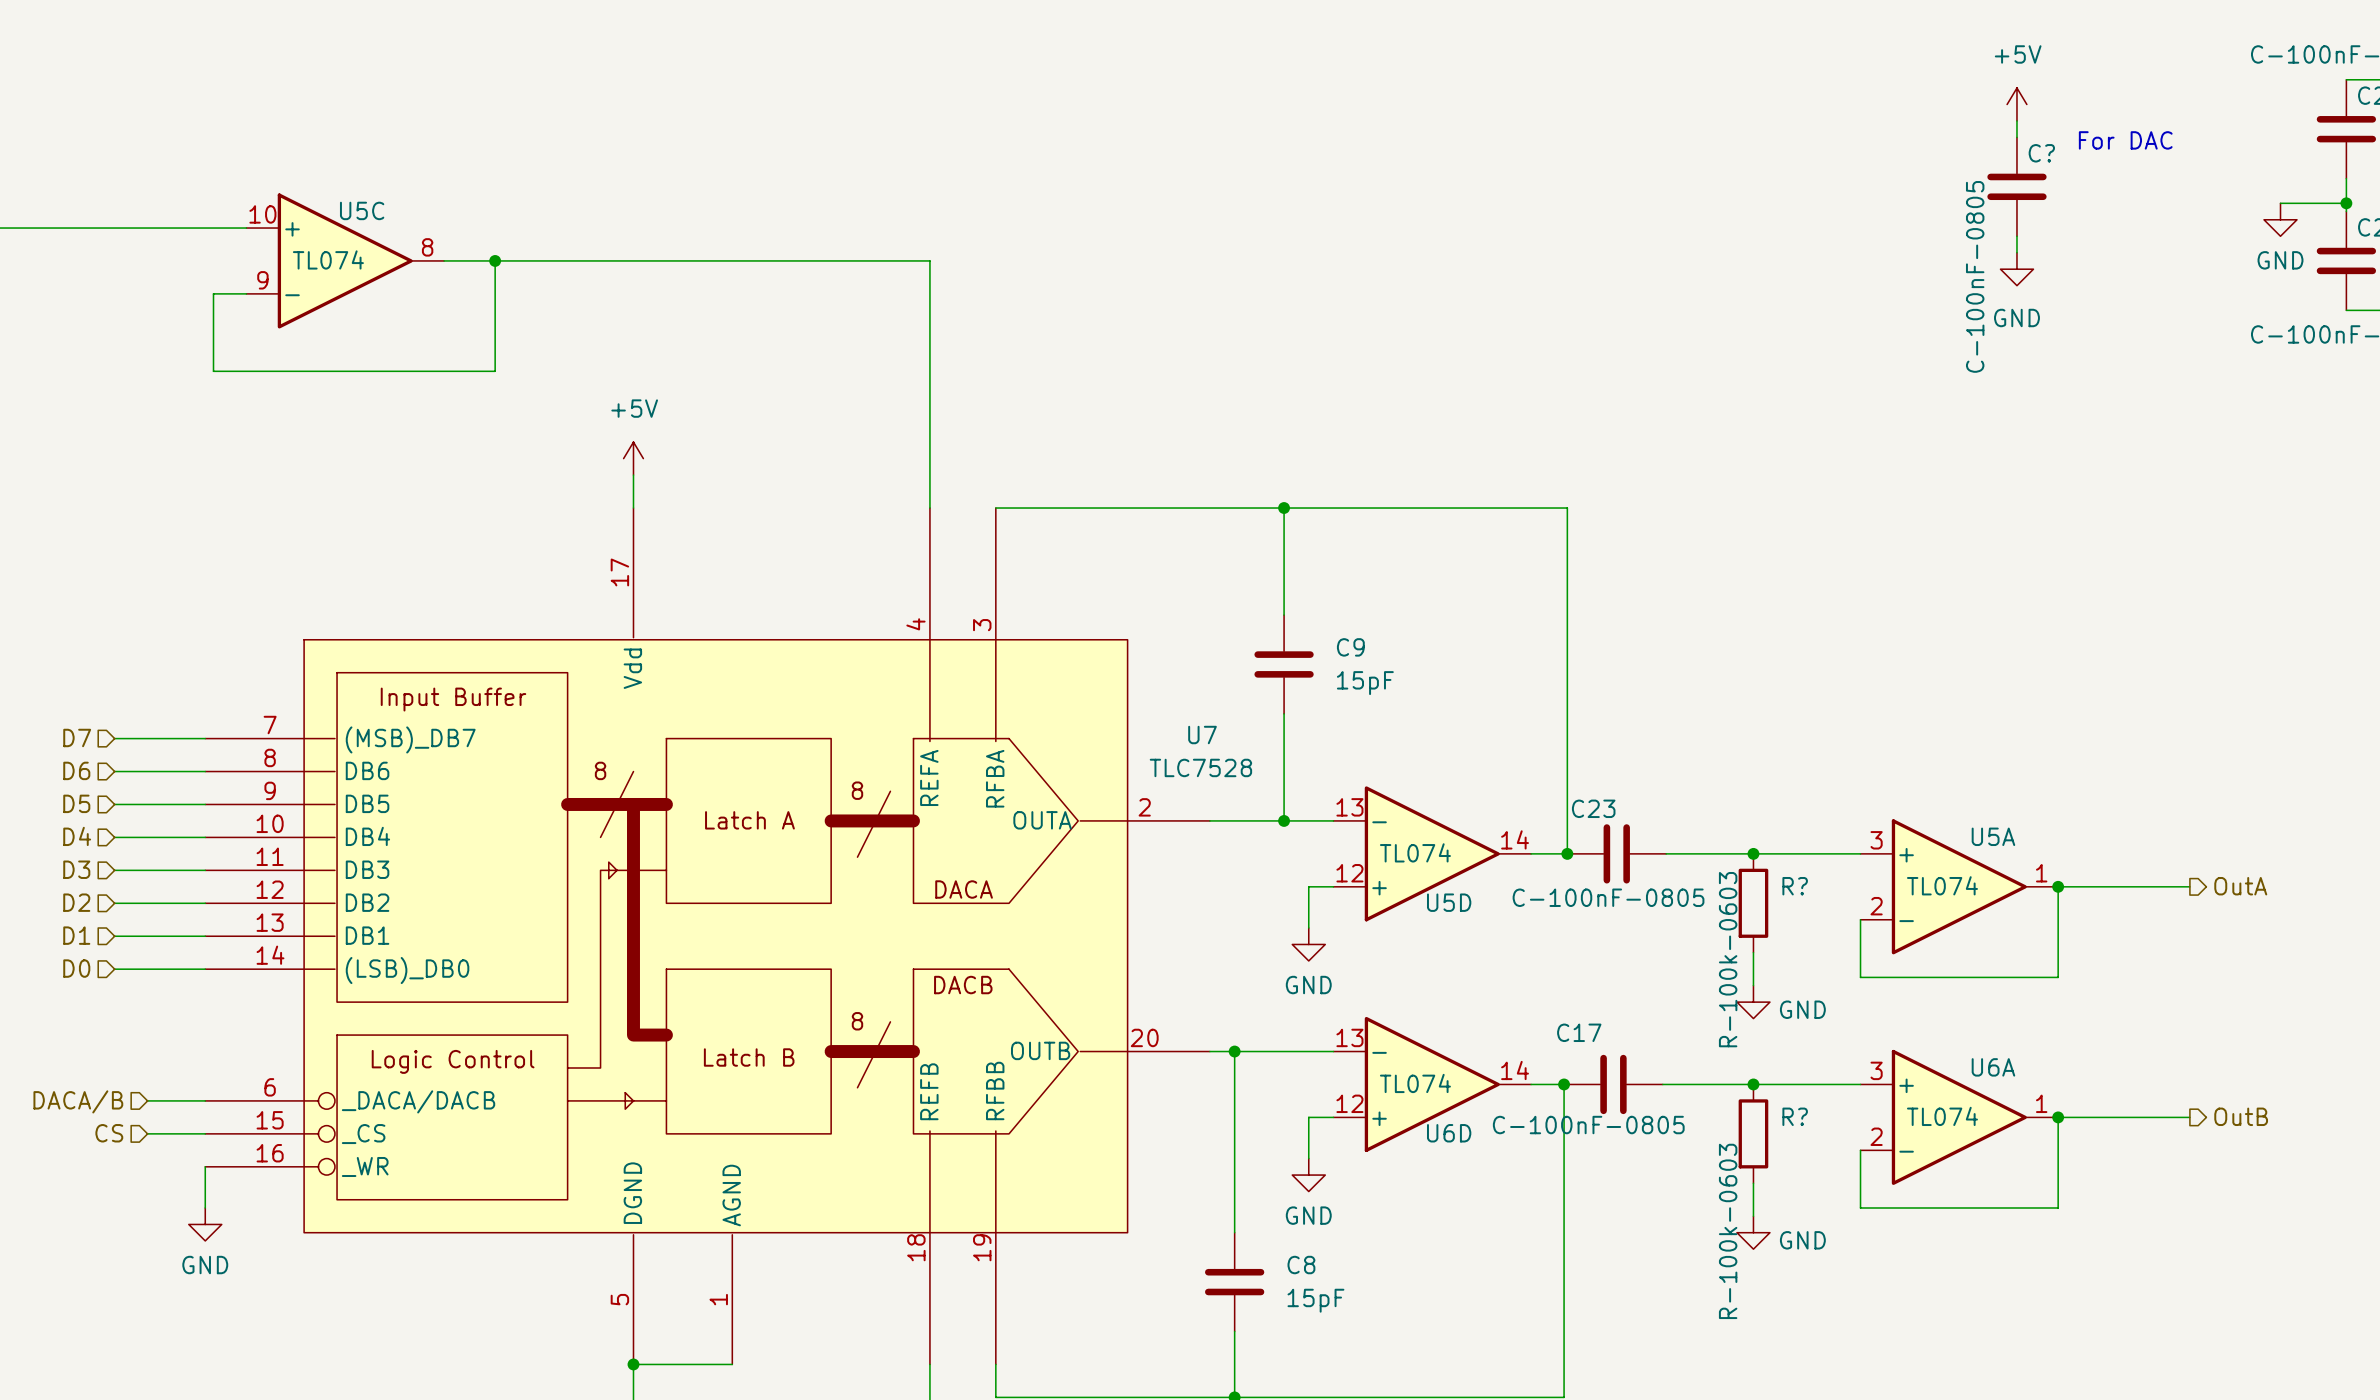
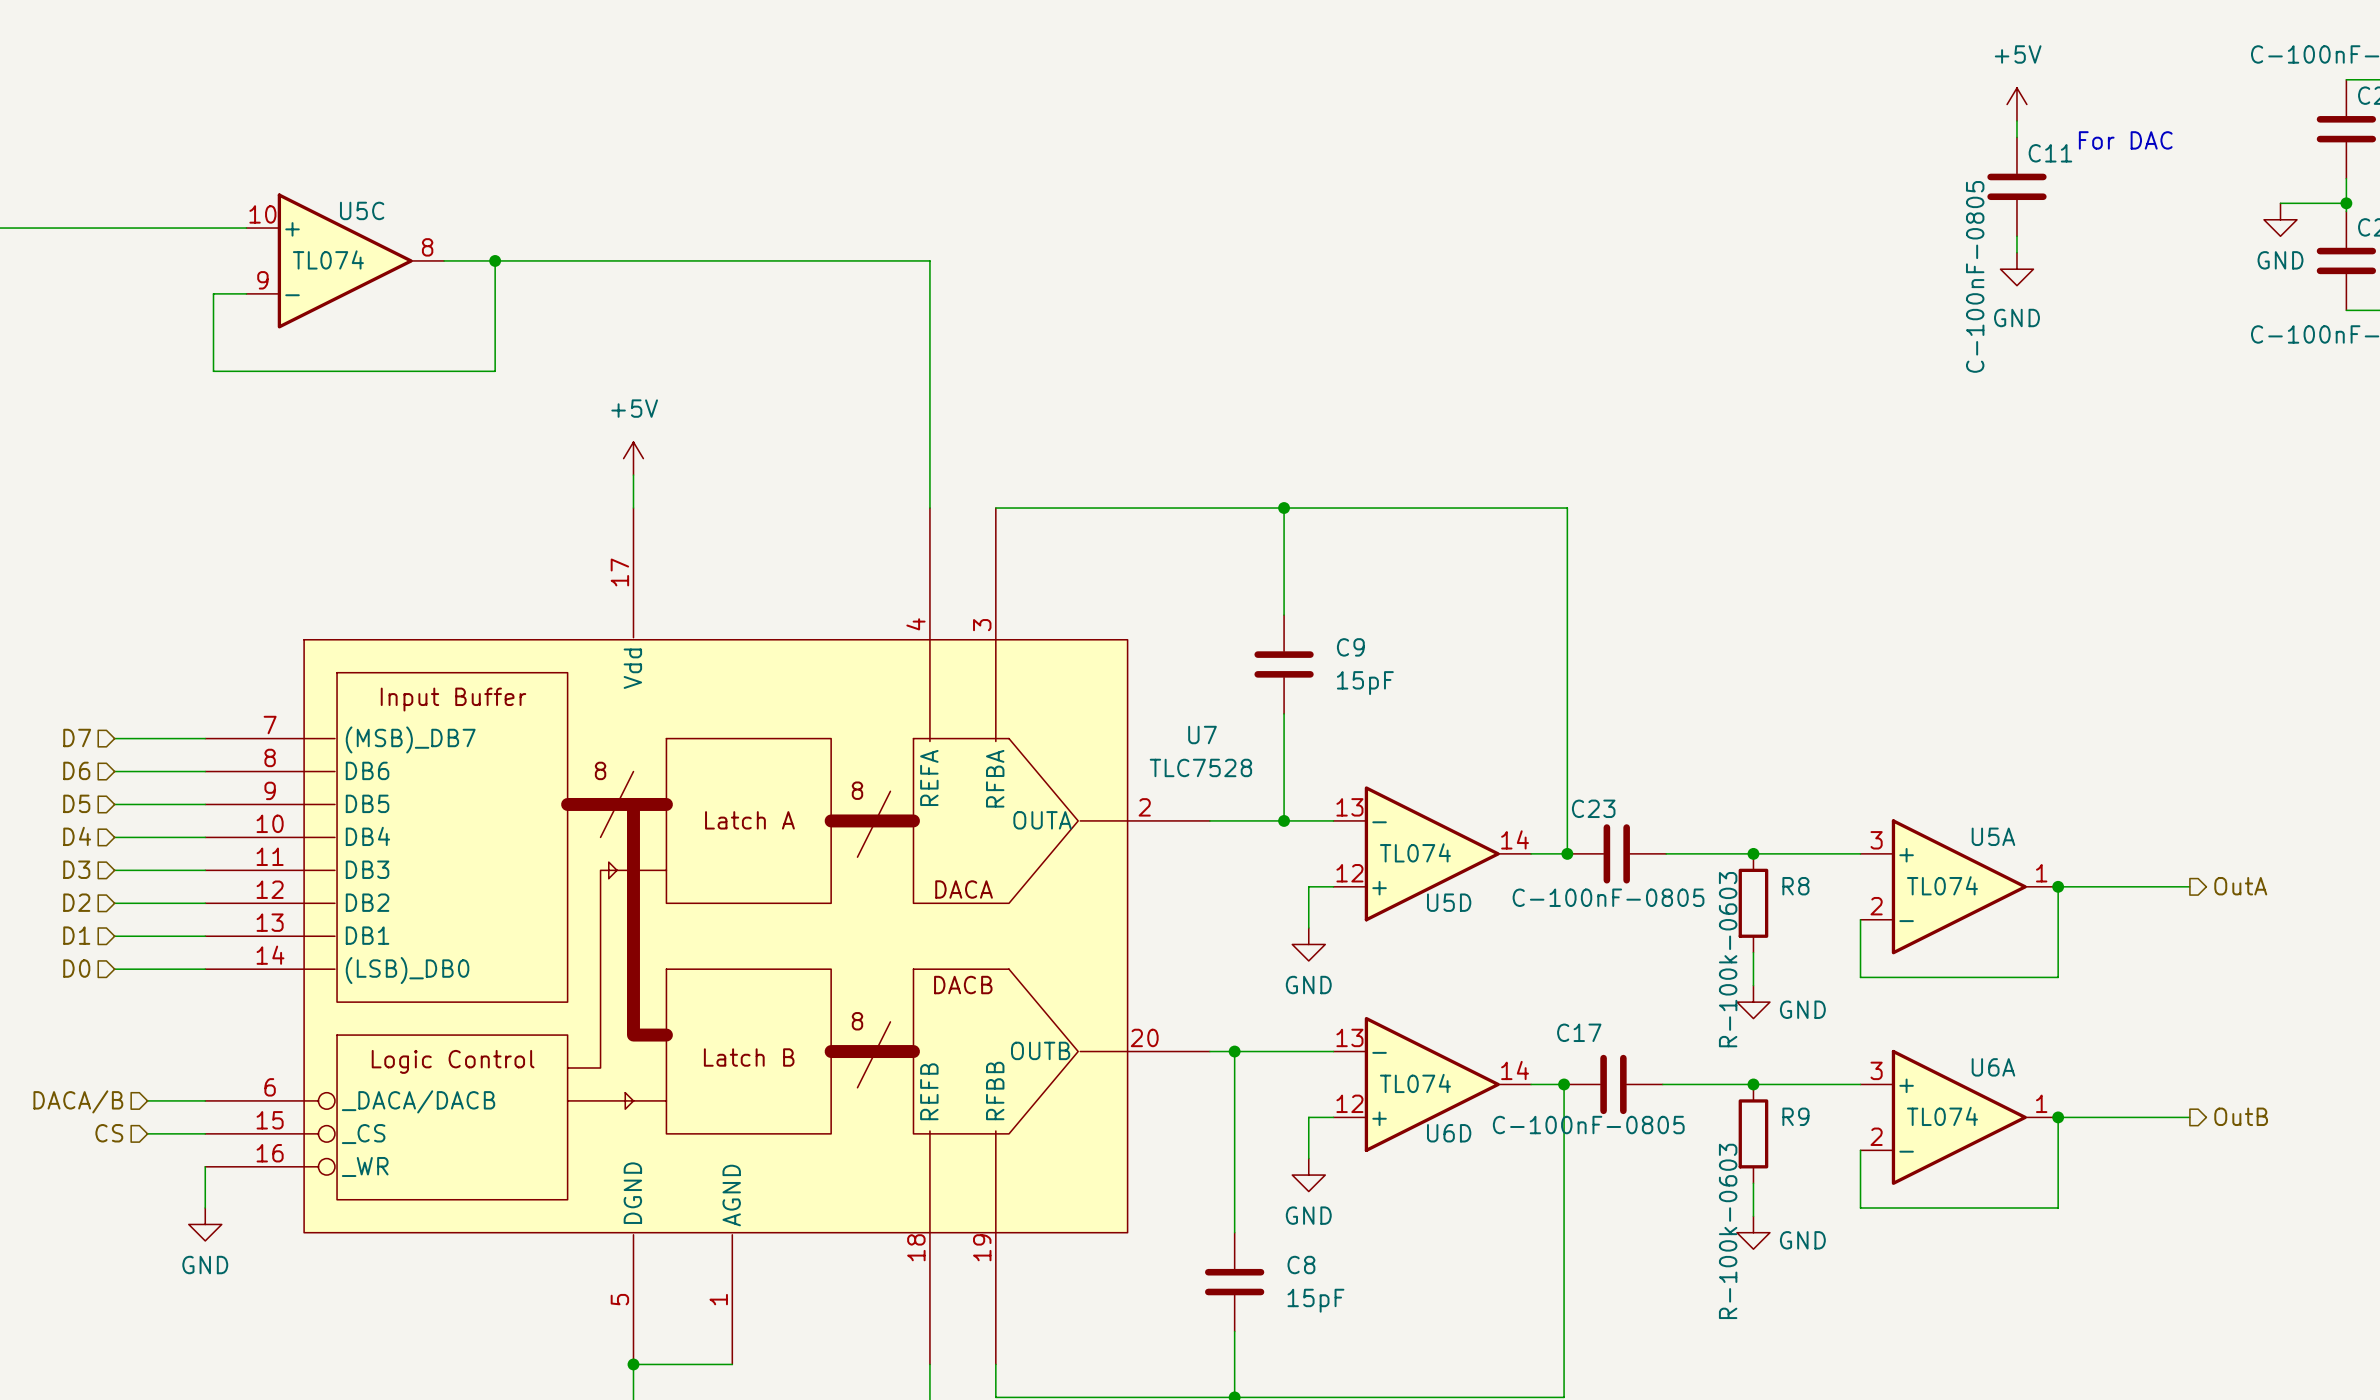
C? name: C? (2041, 153) -> C11 (2050, 153)
R? name: R? (1795, 886) -> R8 (1795, 886)
R? name: R? (1795, 1116) -> R9 (1795, 1116)

